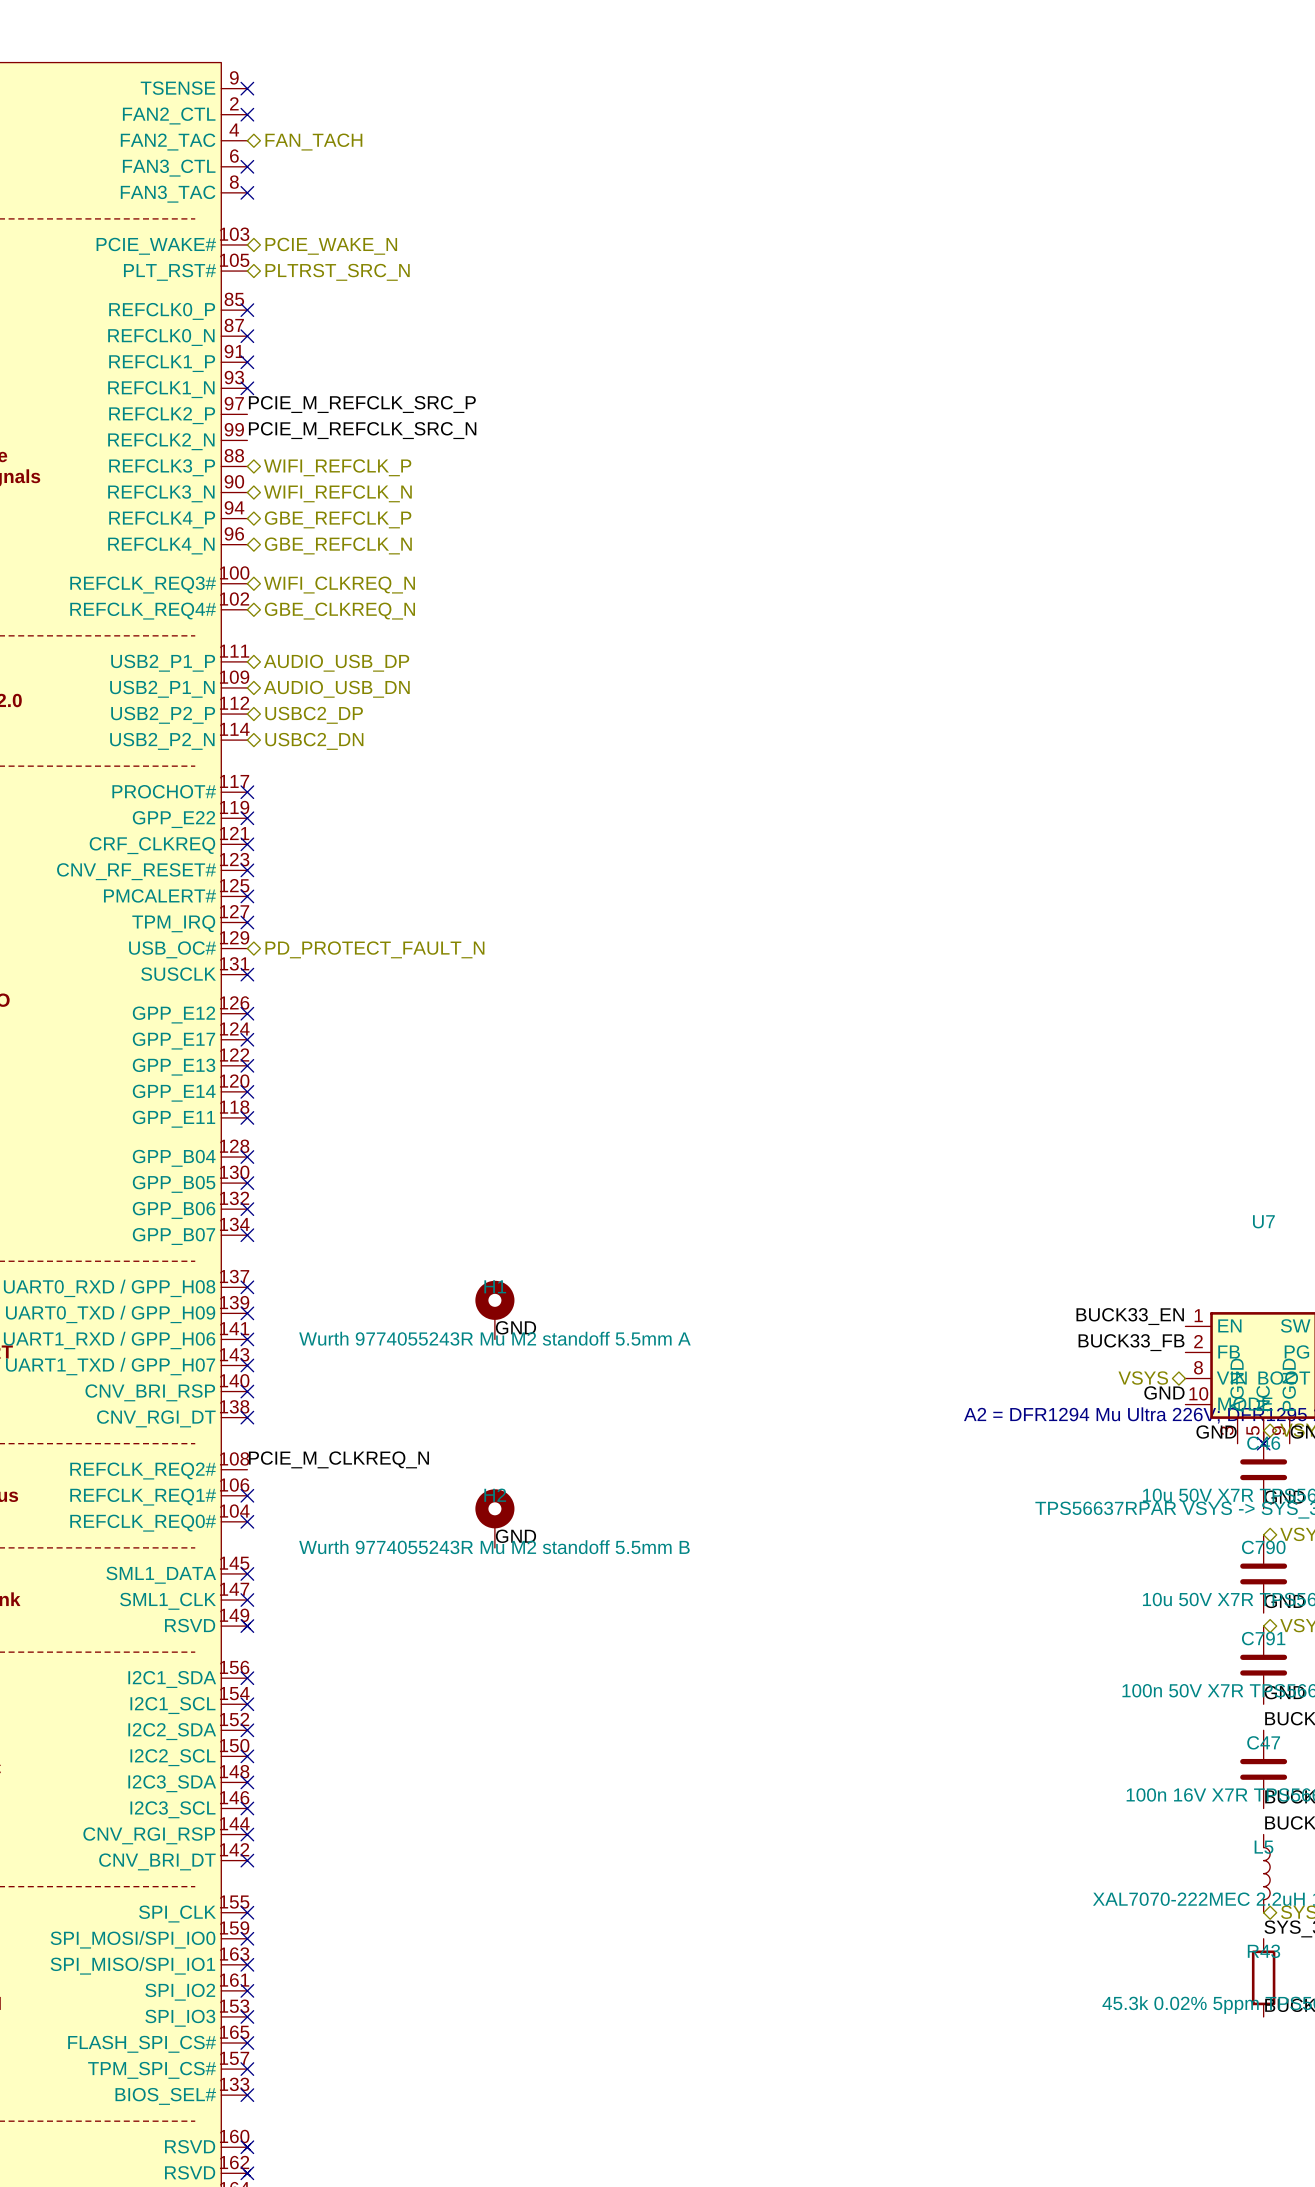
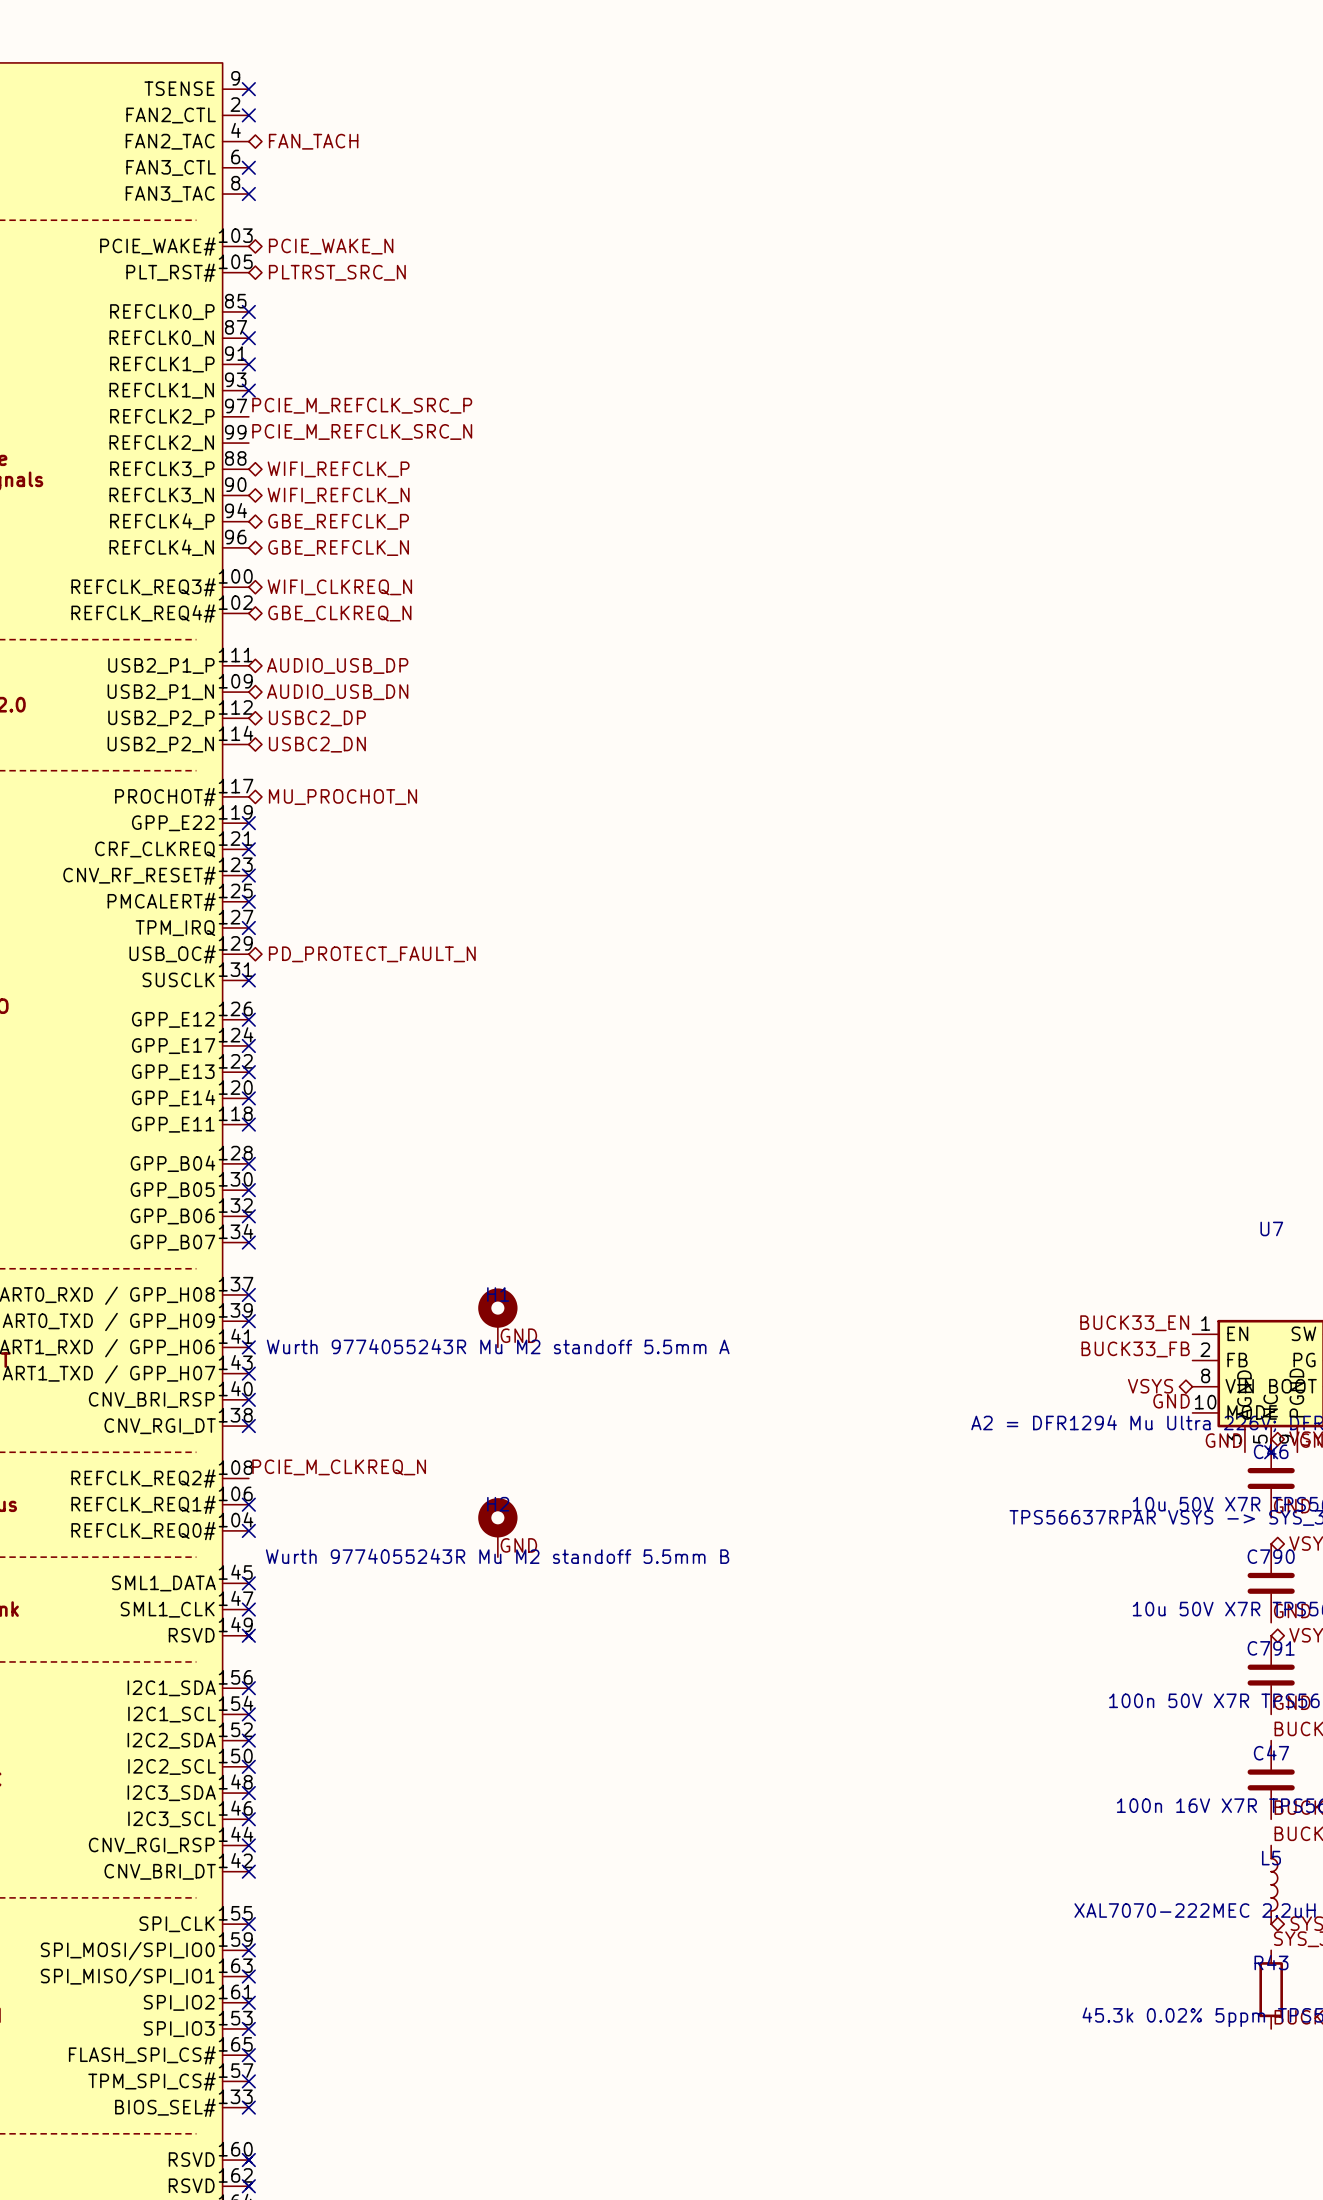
no-connect mark: (247, 792) -> none
hierarchical label: none -> MU_PROCHOT_N (342, 797)

